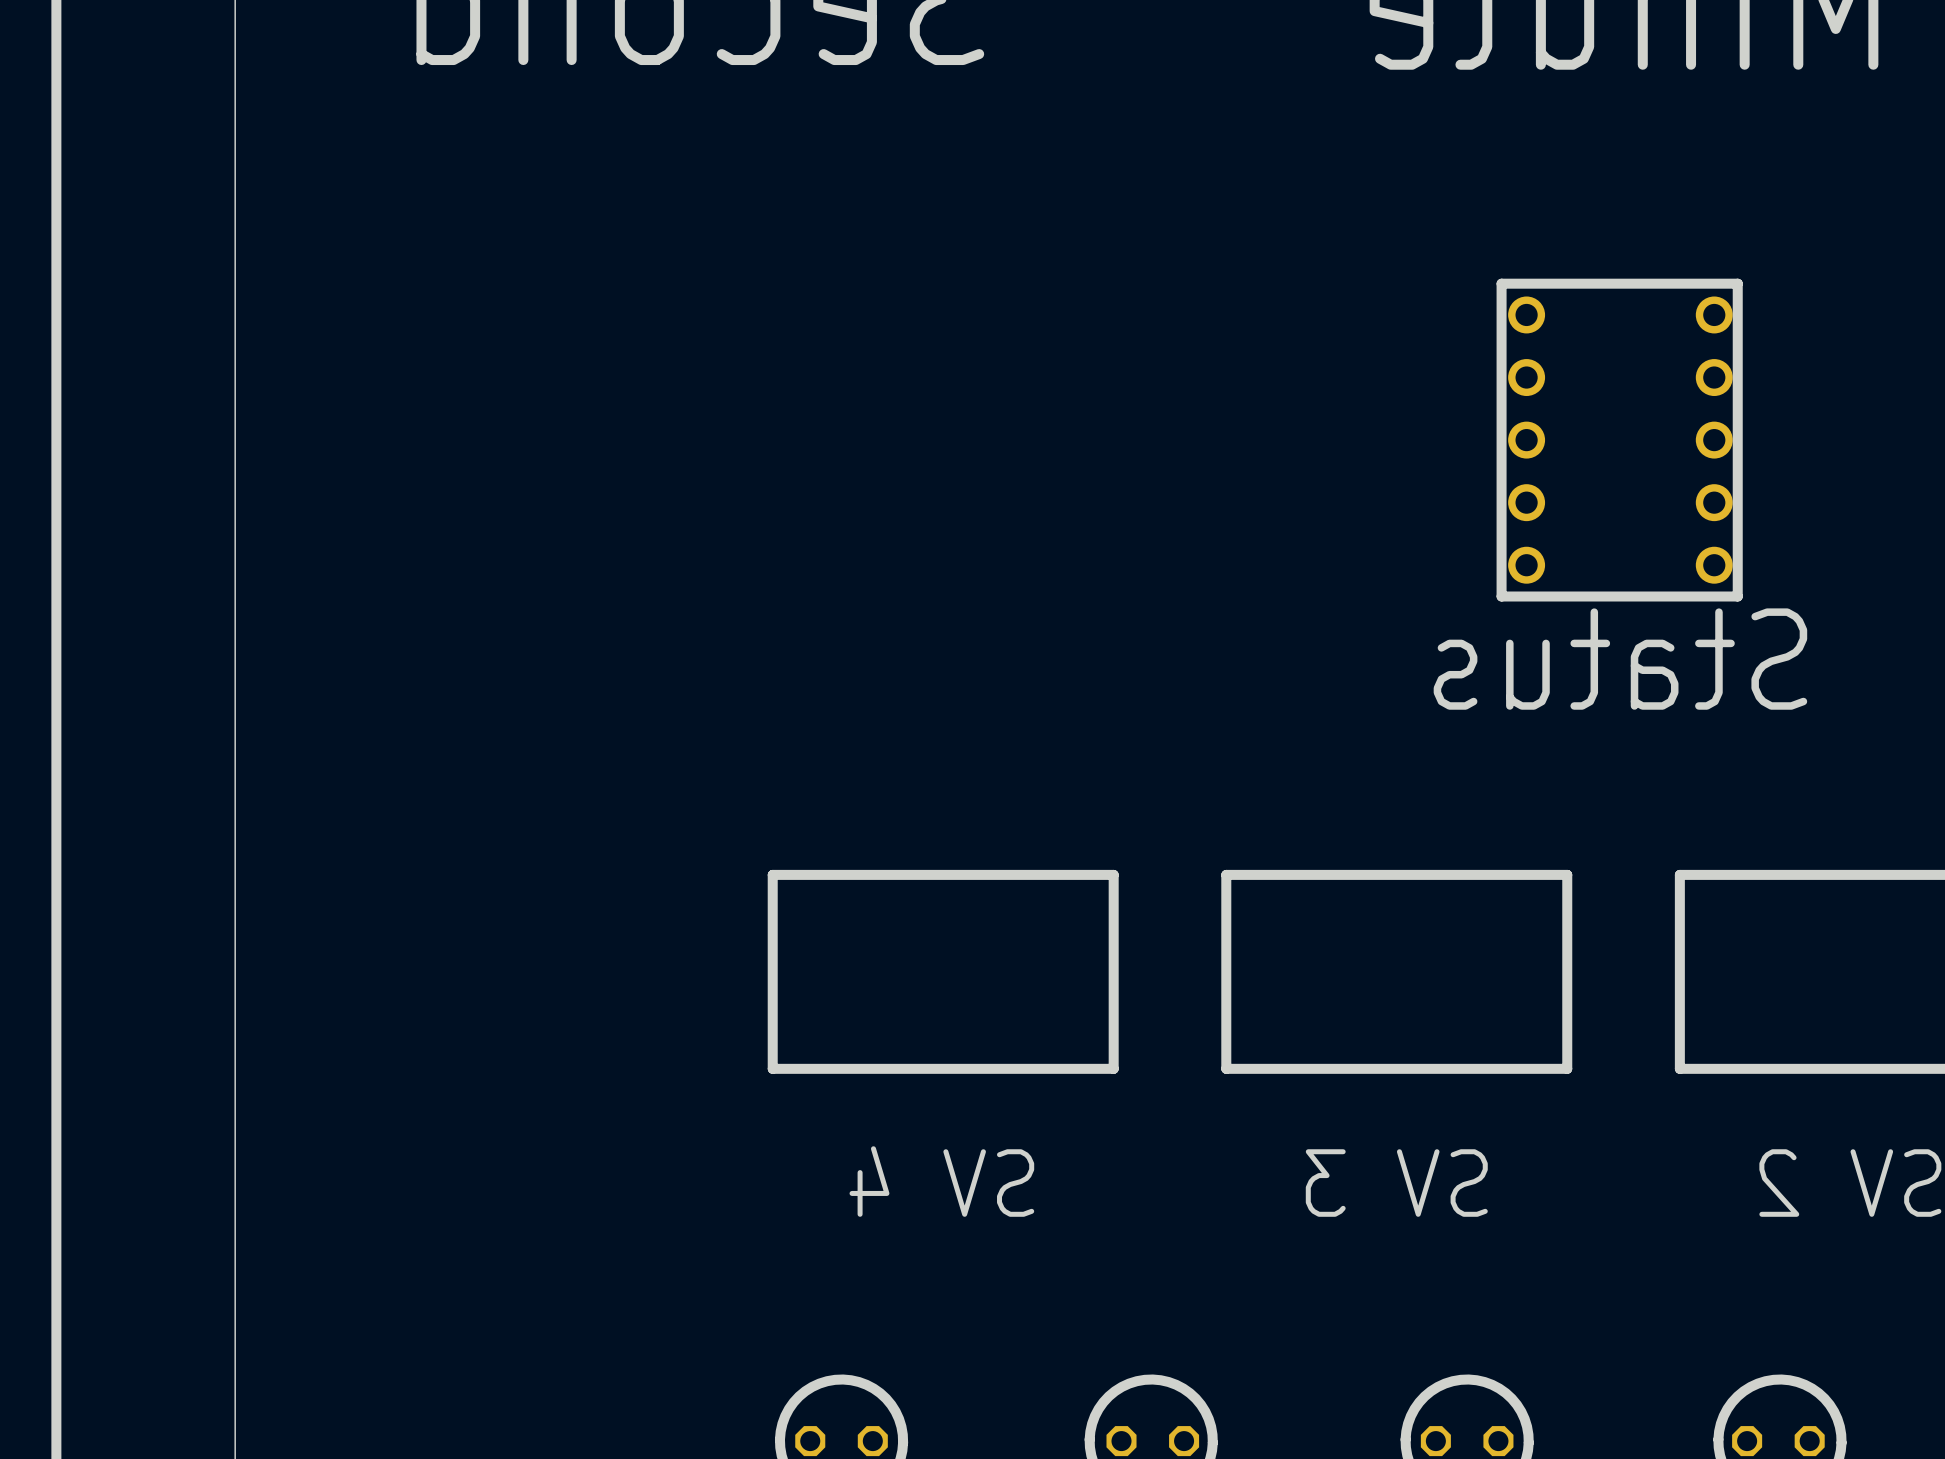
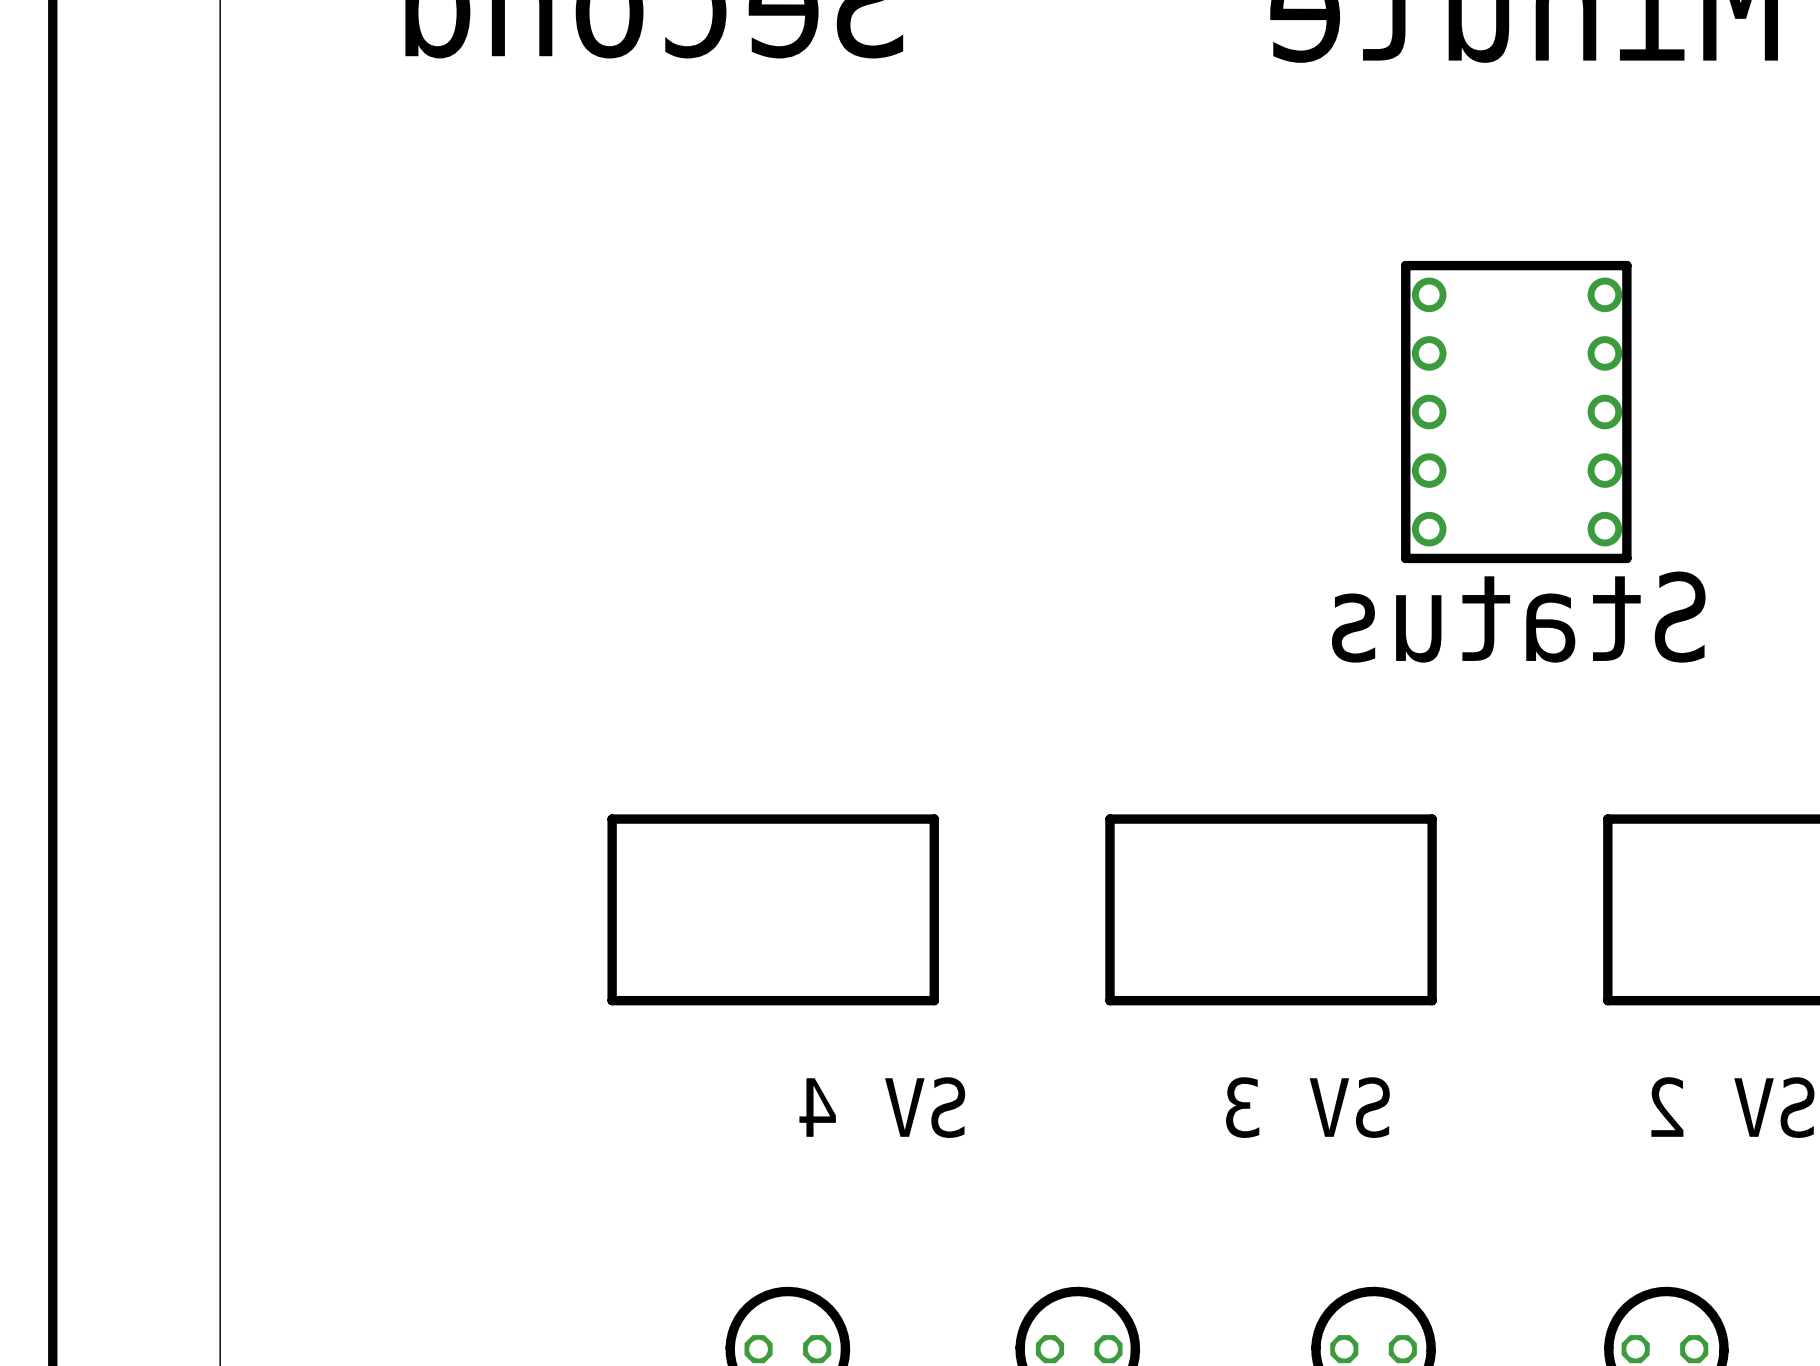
board edge: (772, 874) (772, 1068) -> (723, 819) (612, 819) (612, 1000) (723, 1000)
board edge: (997, 874) (1113, 874) (1113, 1068) (997, 1068) -> (934, 819) (934, 1000)
board edge: (1226, 874) (1226, 1068) -> (1148, 819) (1109, 819) (1109, 1000) (1148, 1000)
board edge: (1529, 874) (1567, 874) (1567, 1068) (1529, 1068) -> (1432, 819) (1432, 1000)
board edge: (1717, 874) (1679, 874) (1679, 1068) (1717, 1068) -> (1607, 819) (1607, 1000)

